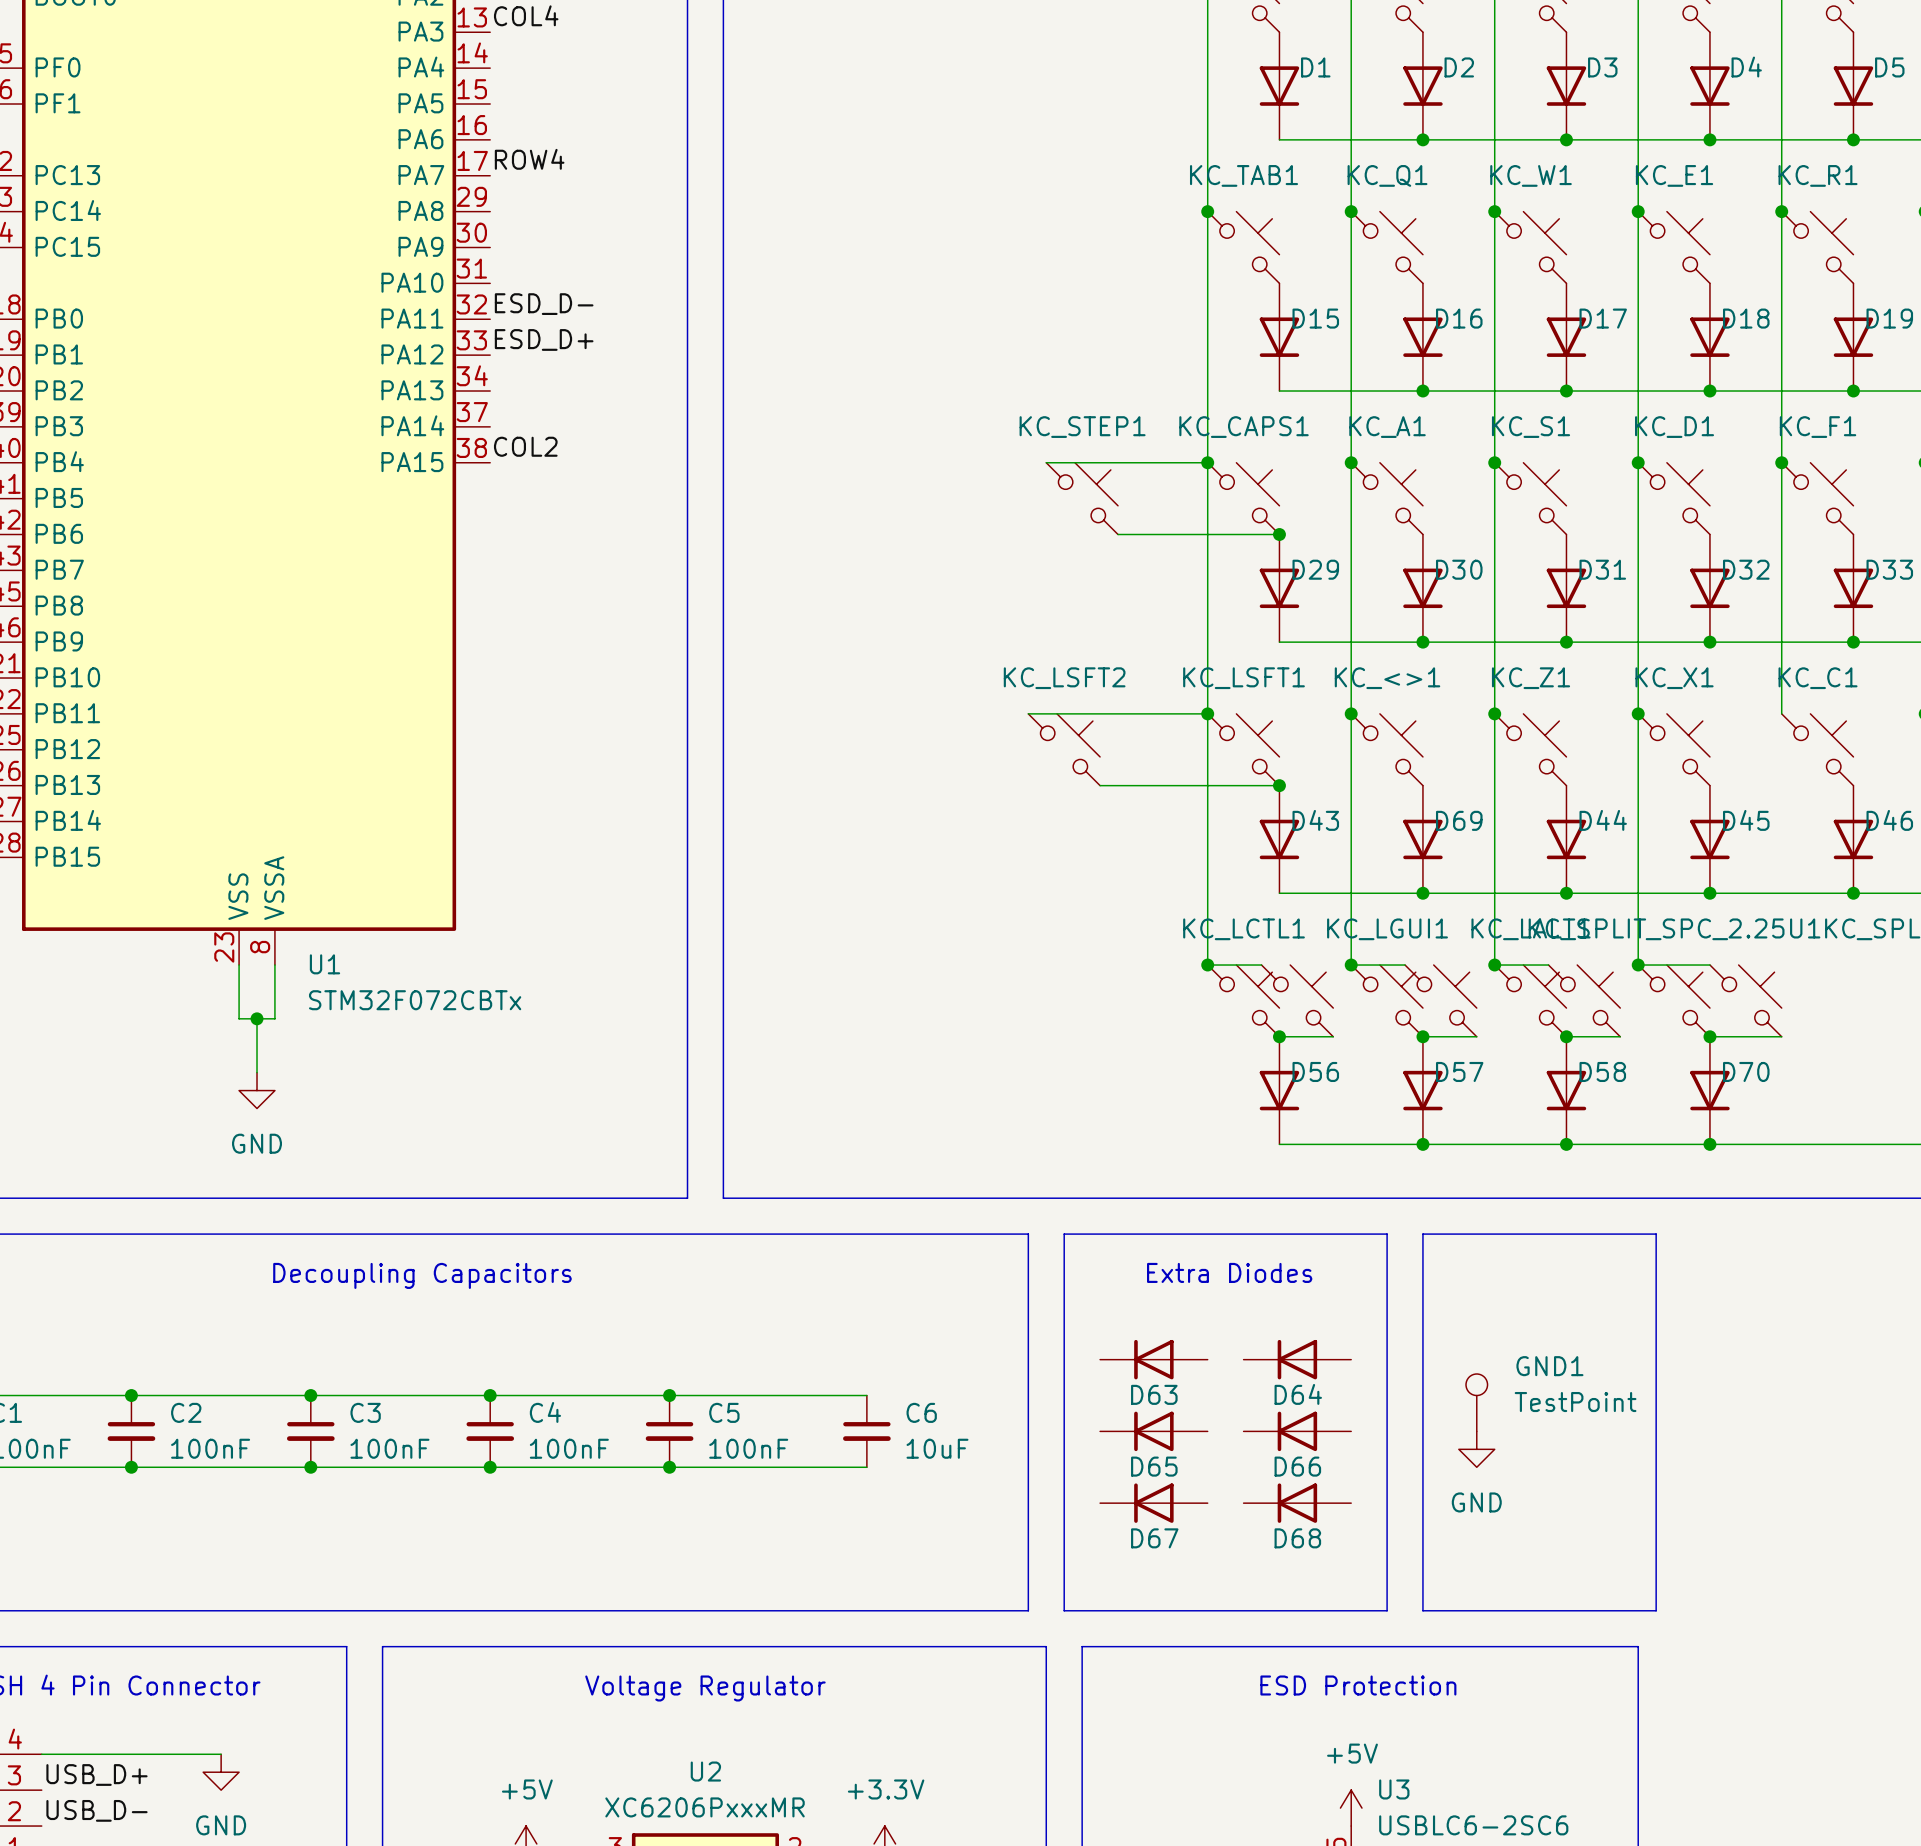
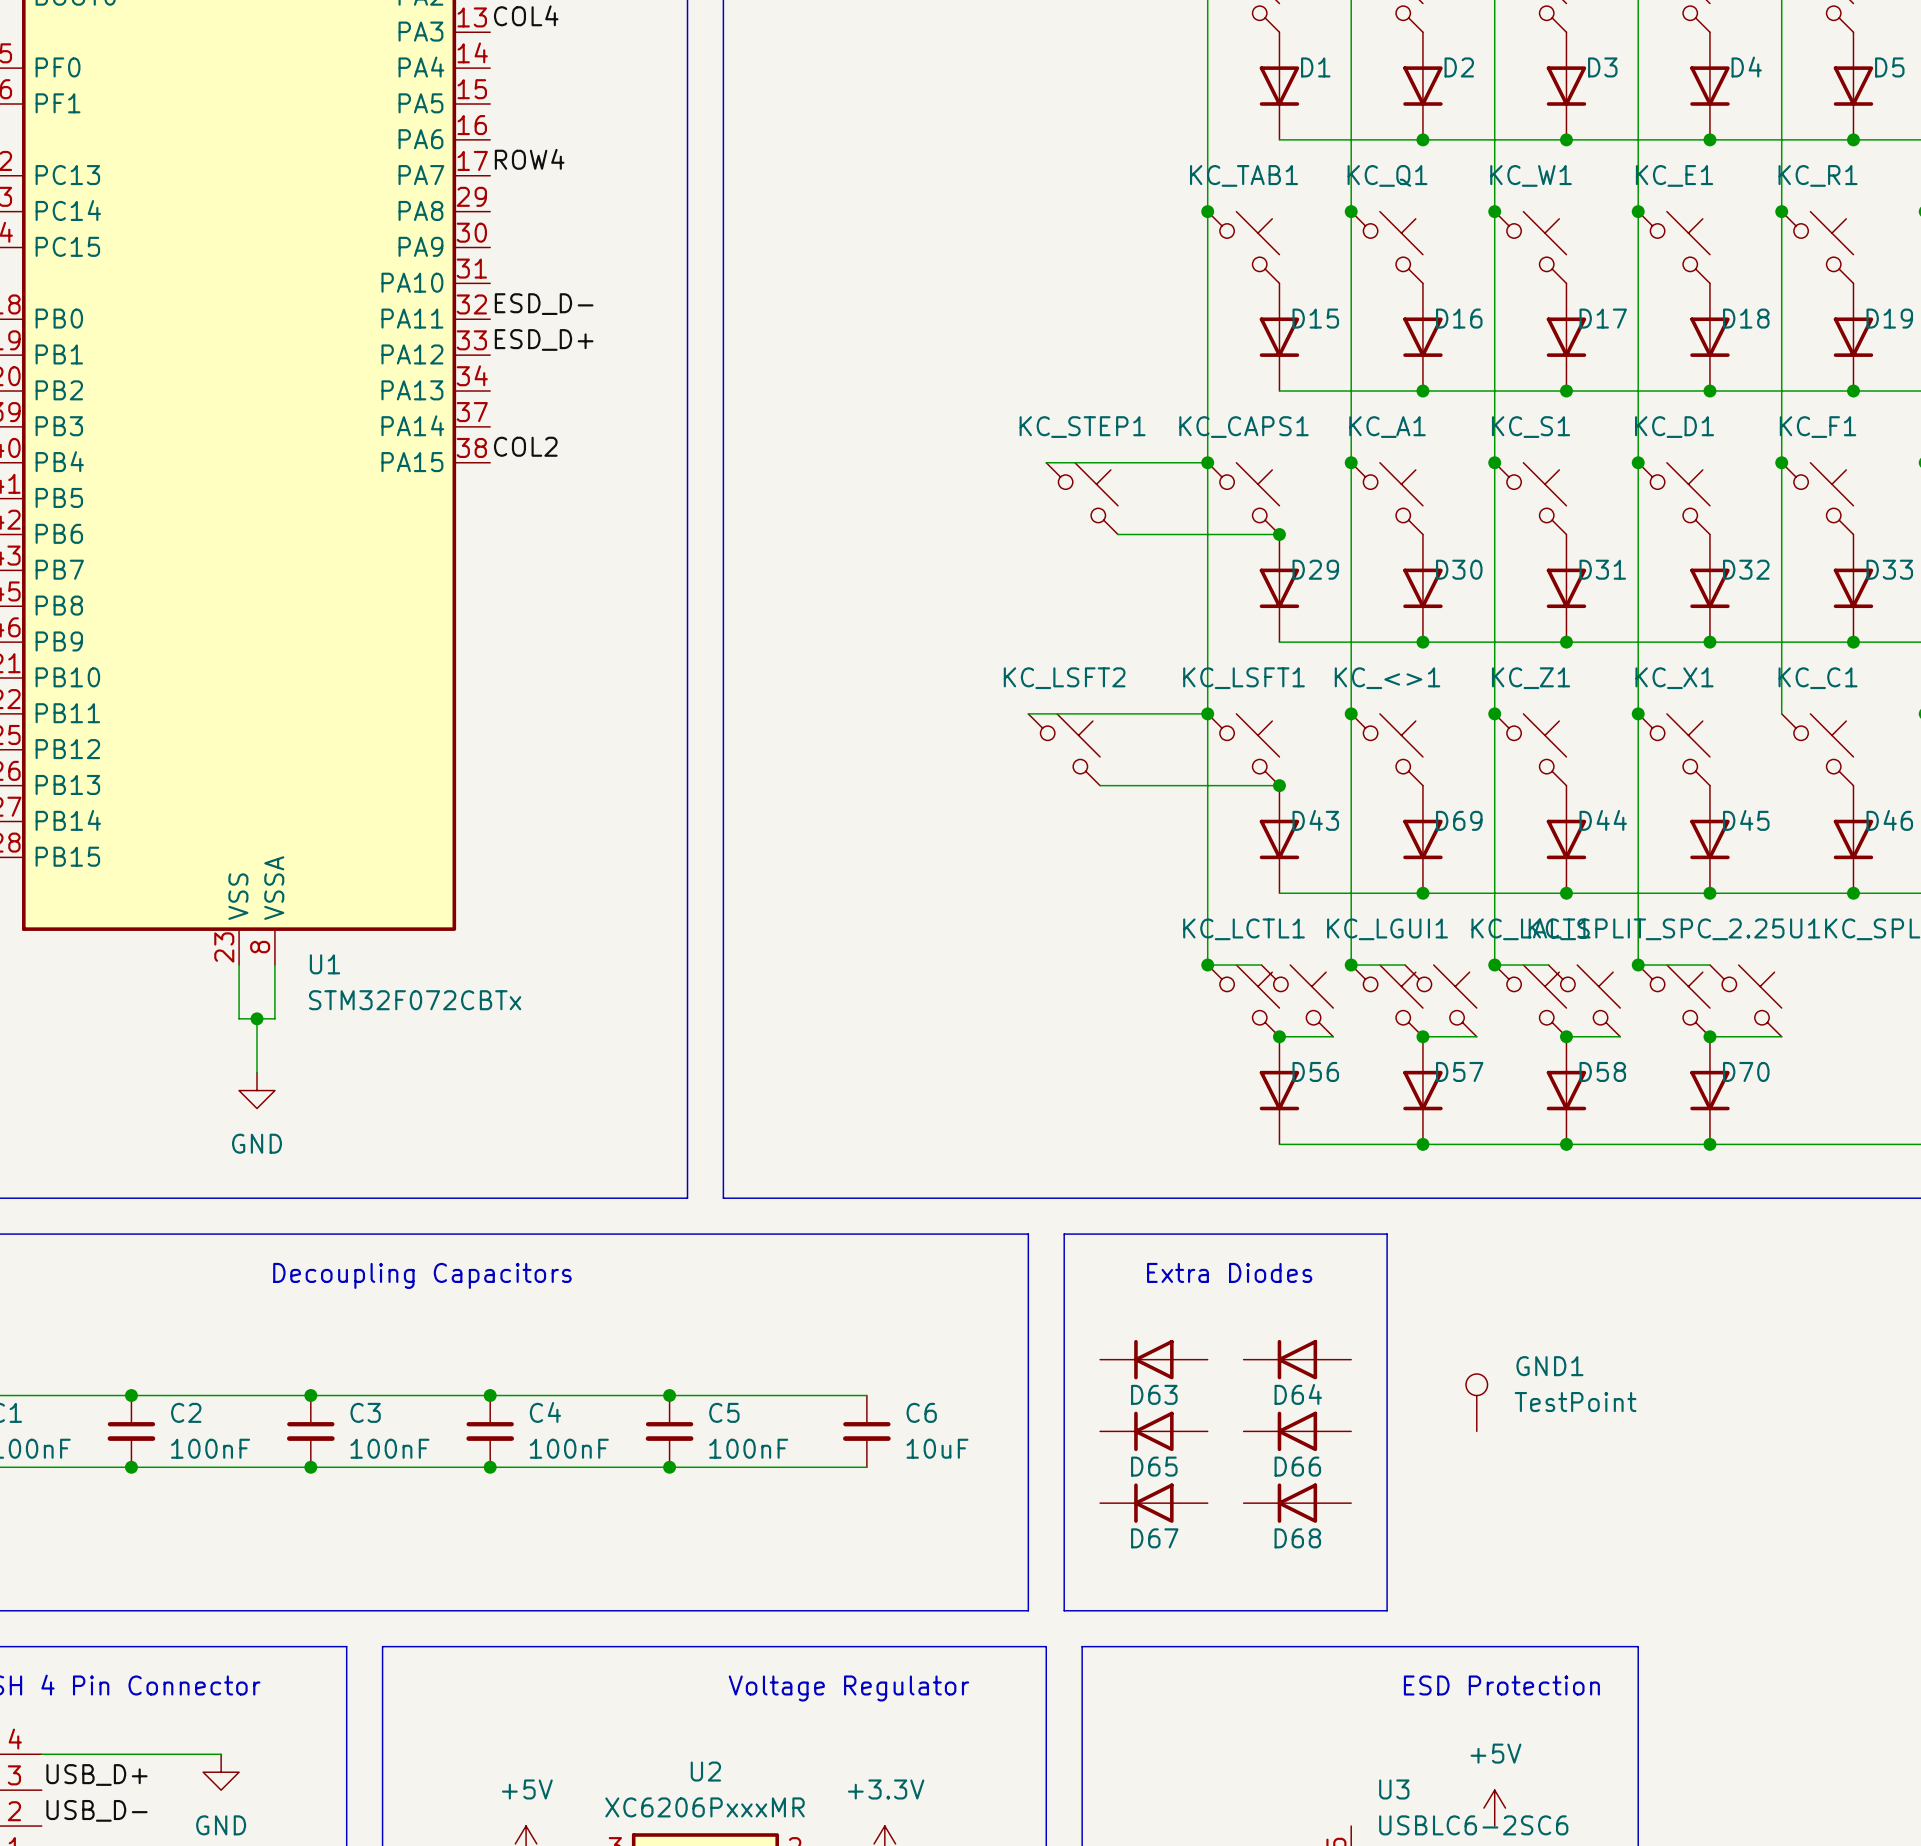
line: (1422, 1234) (1656, 1234) (1656, 1610) (1422, 1610) (1422, 1234) -> none
power symbol: GND (1476, 1449) -> none
text position: ESD Protection (1358, 1685) -> ESD Protection (1501, 1685)
text position: Voltage Regulator (705, 1688) -> Voltage Regulator (848, 1688)
power symbol position: +5V (1351, 1808) -> +5V (1494, 1808)

